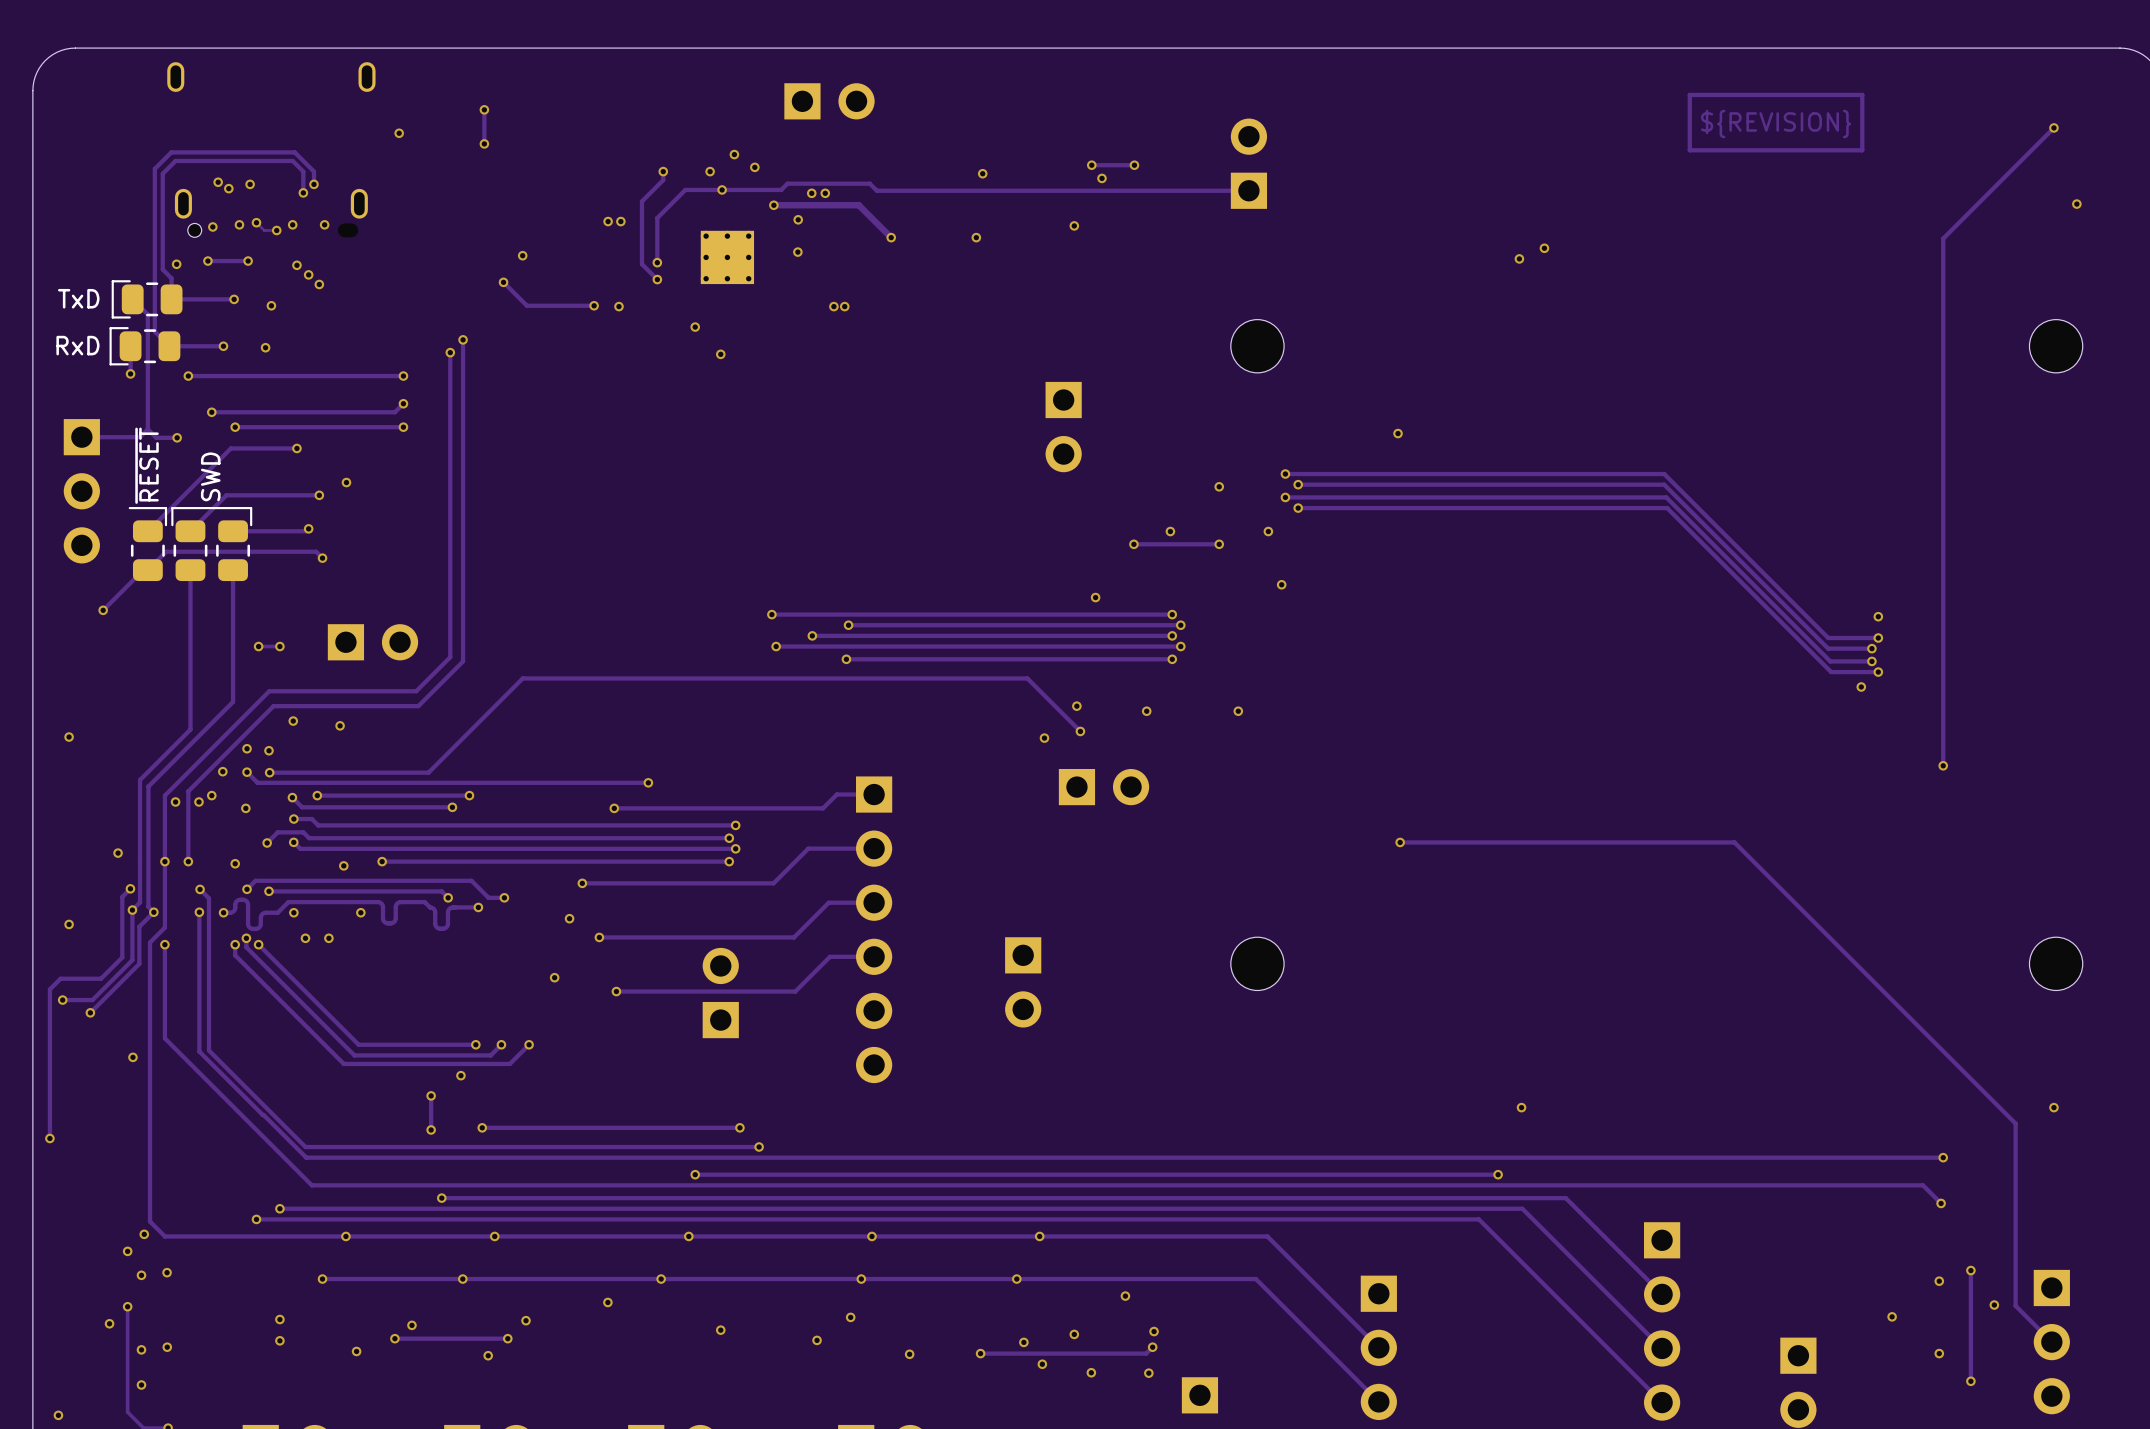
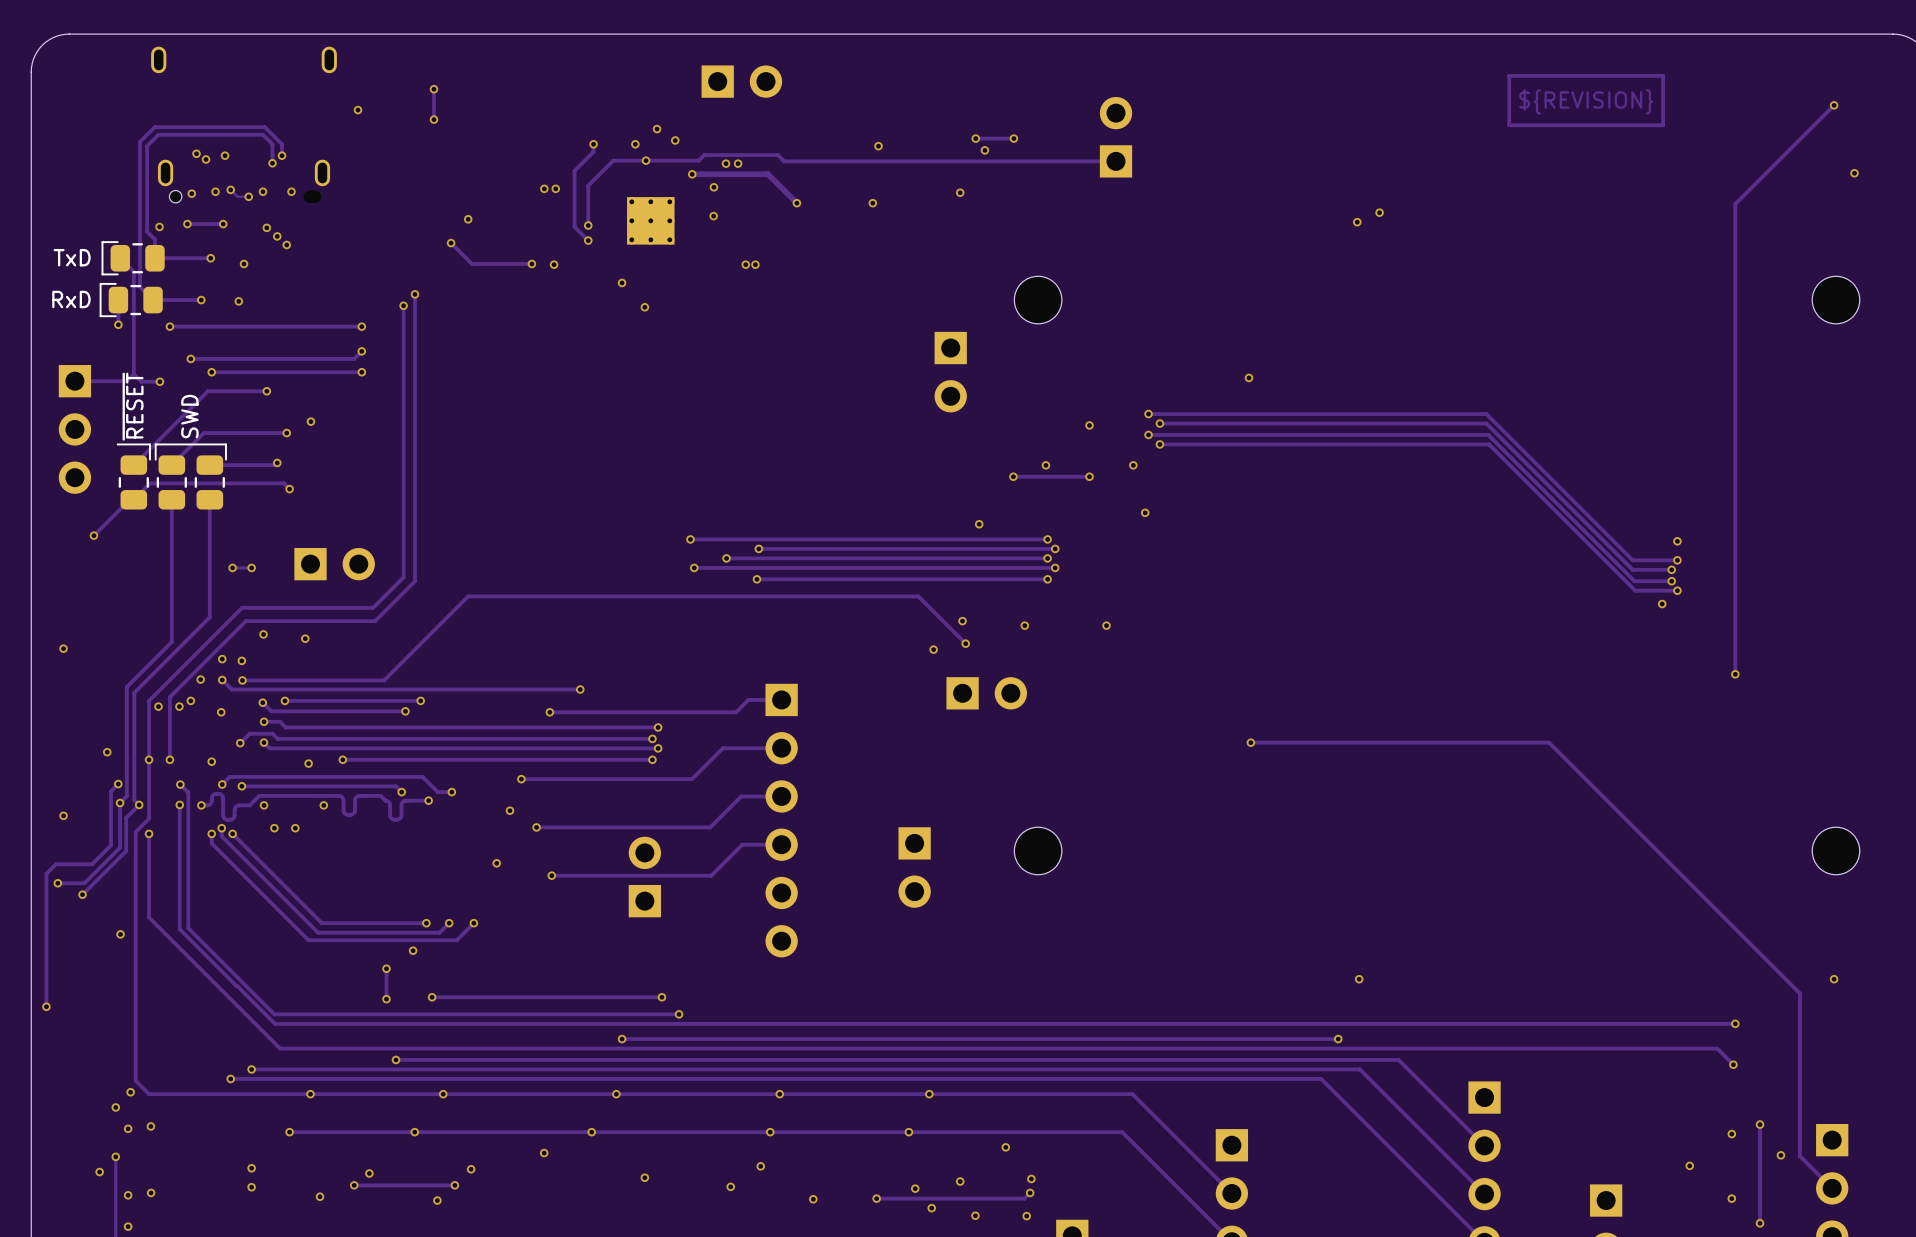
part position: (1257, 346) -> (1038, 300)
part position: (1257, 963) -> (1038, 850)

